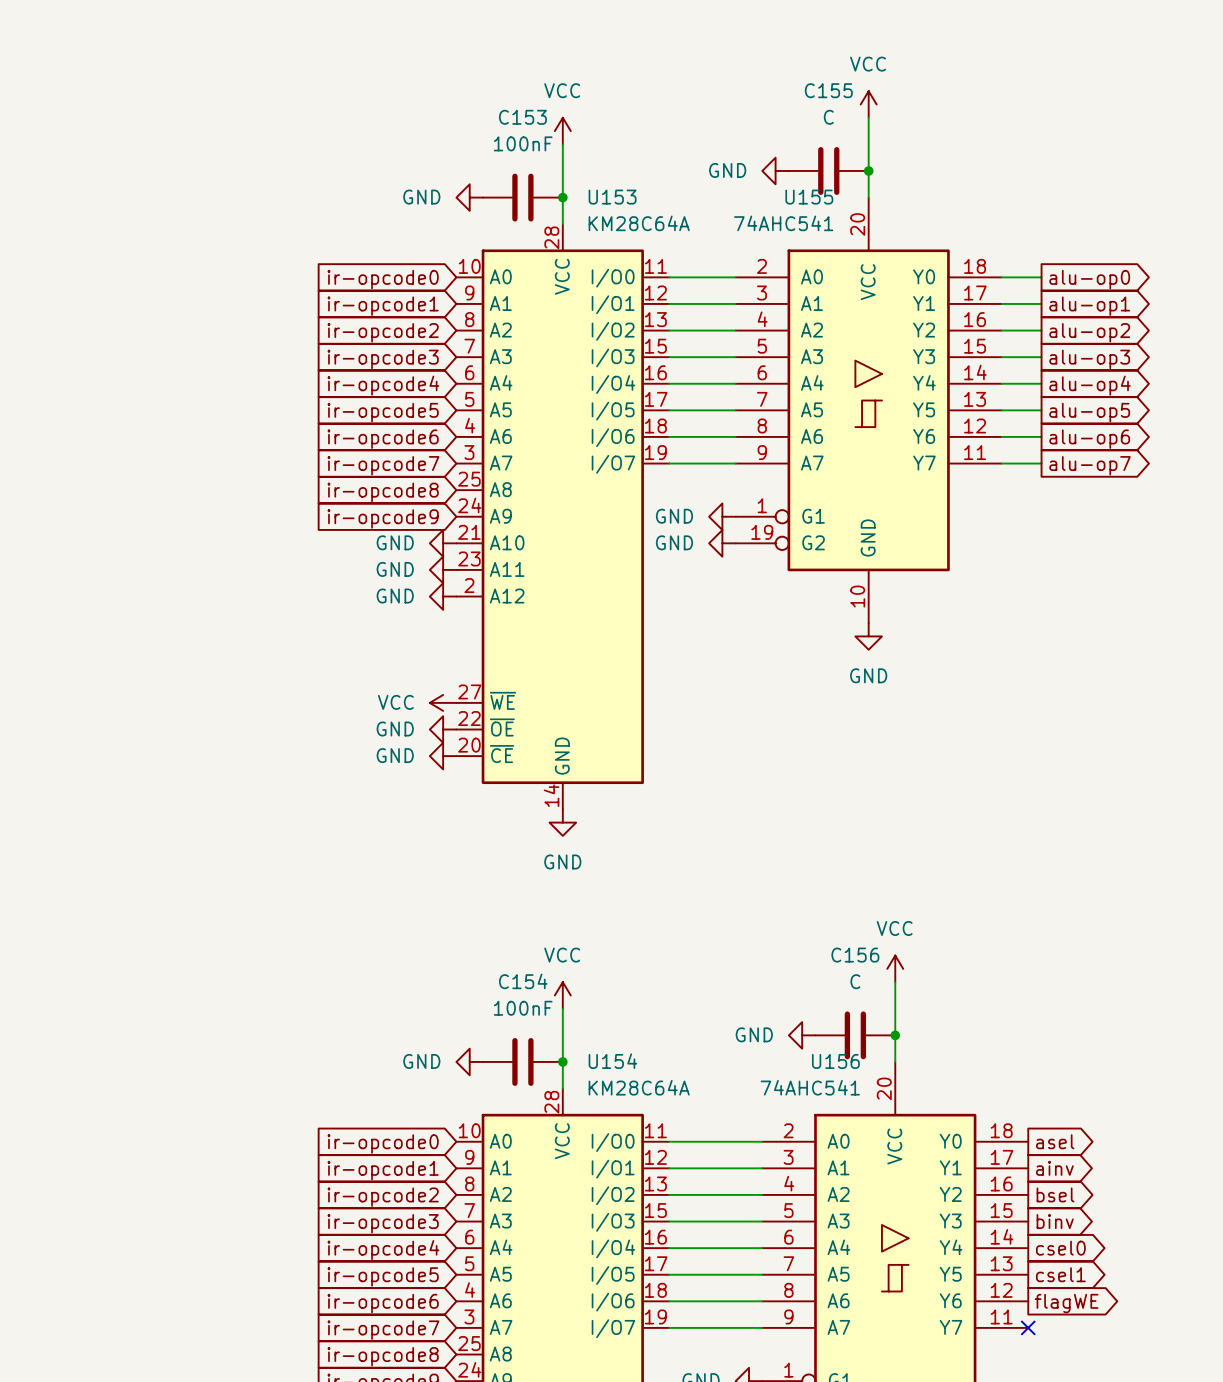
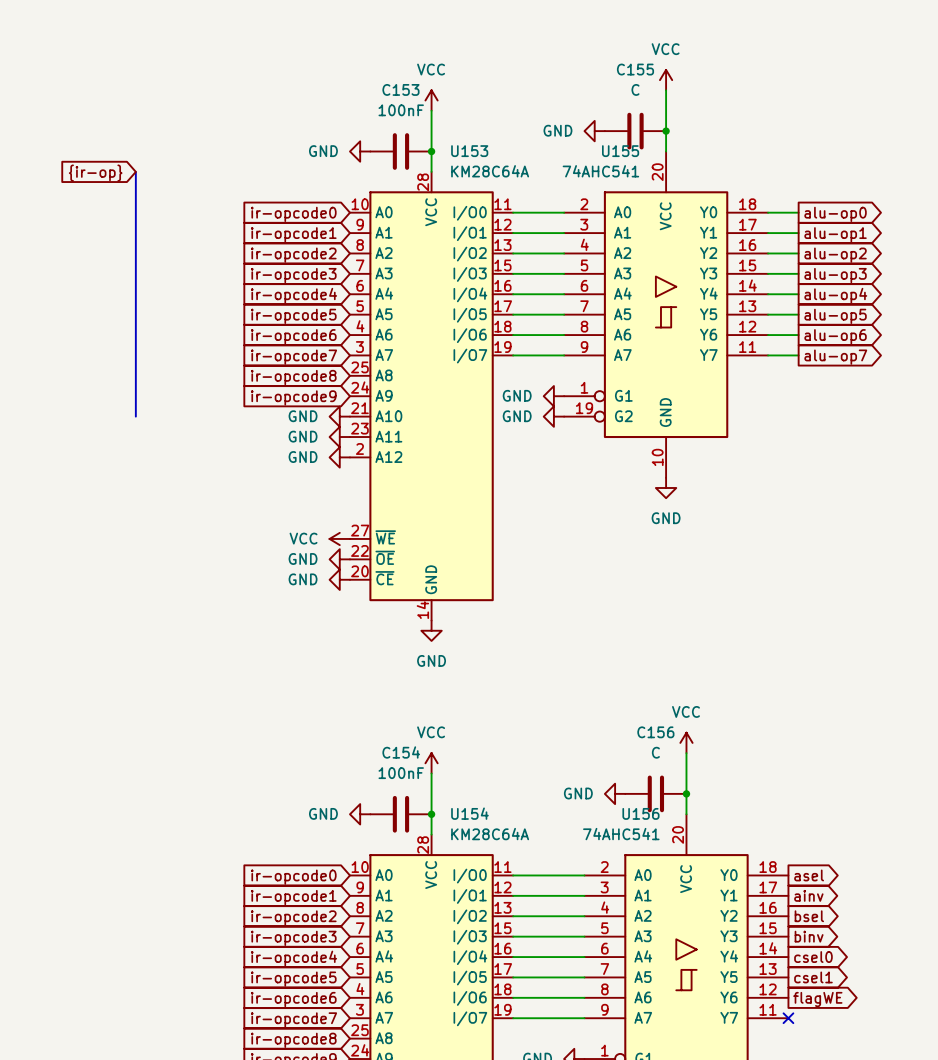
bus: none -> (135, 171) (135, 416)
global label: none -> {ir-op} (95, 173)

